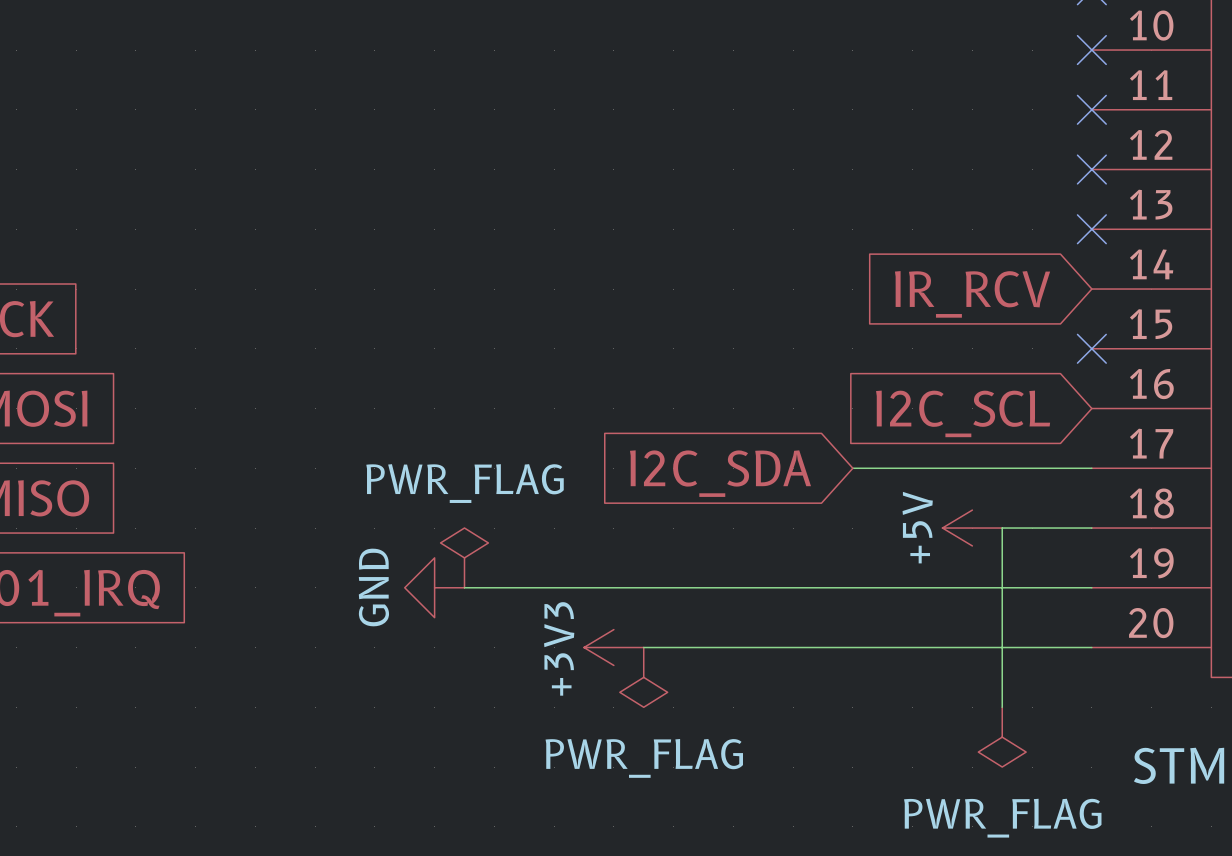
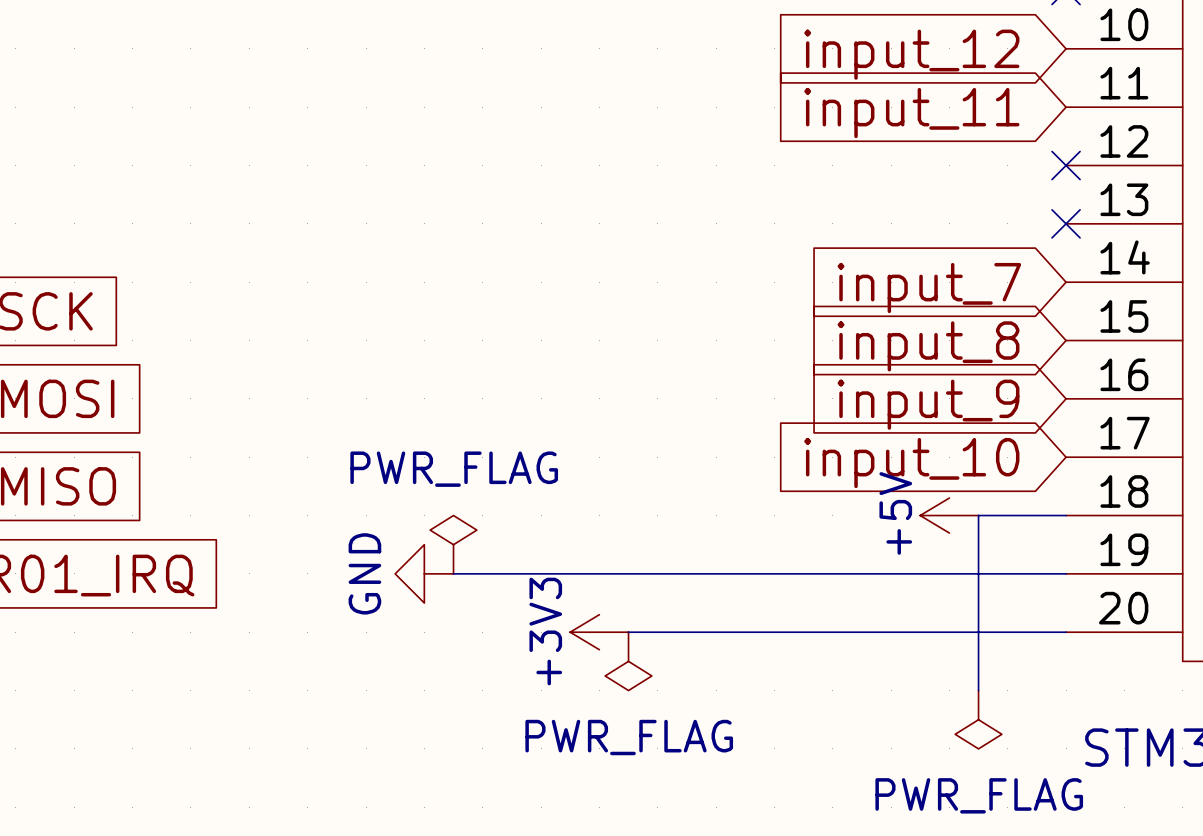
no-connect mark: (1091, 50) -> none
global label: none -> input_12 (911, 54)
no-connect mark: (1091, 109) -> none
global label: none -> input_11 (911, 113)
global label: IR_RCV (972, 294) -> input_7 (929, 288)
no-connect mark: (1091, 348) -> none
global label: none -> input_8 (928, 346)
global label: I2C_SCL (963, 413) -> input_9 (928, 404)
wire: (852, 468) (1091, 468) -> none
global label: I2C_SDA (720, 473) -> none
global label: none -> input_10 (911, 463)

